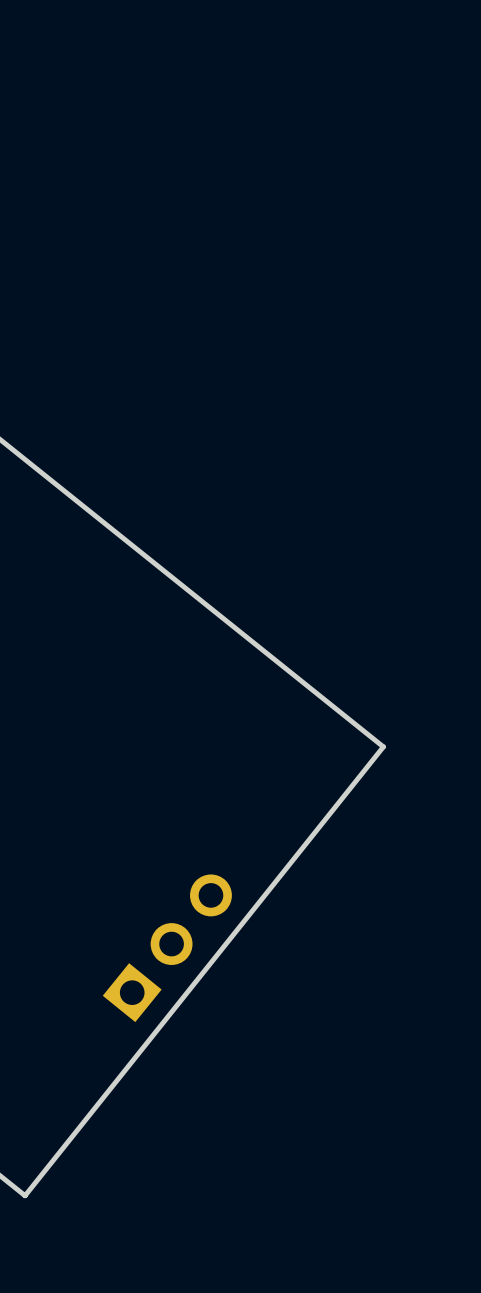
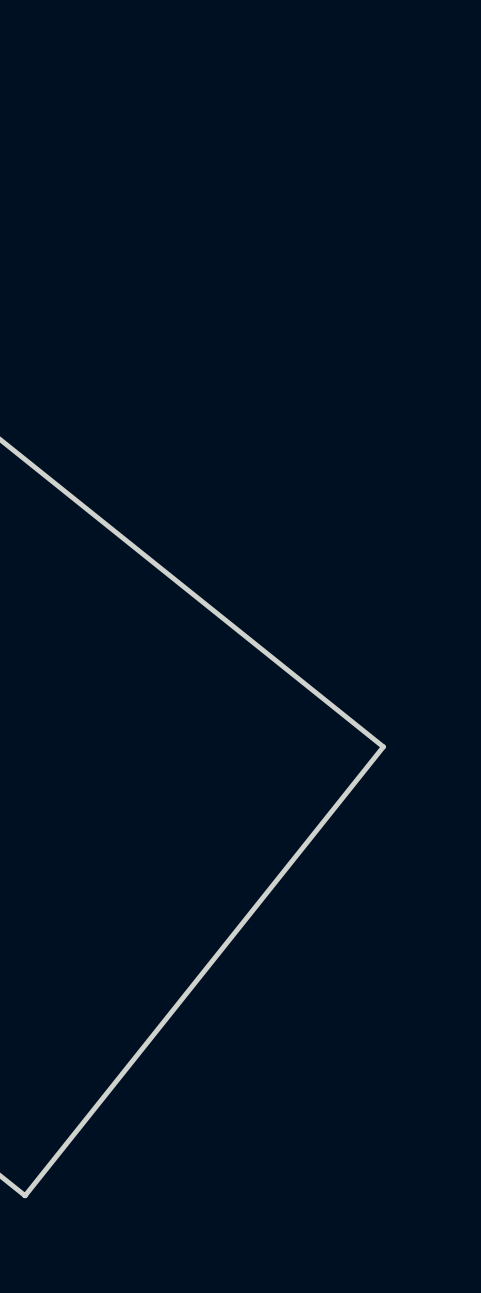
part: (167, 948) -> none

